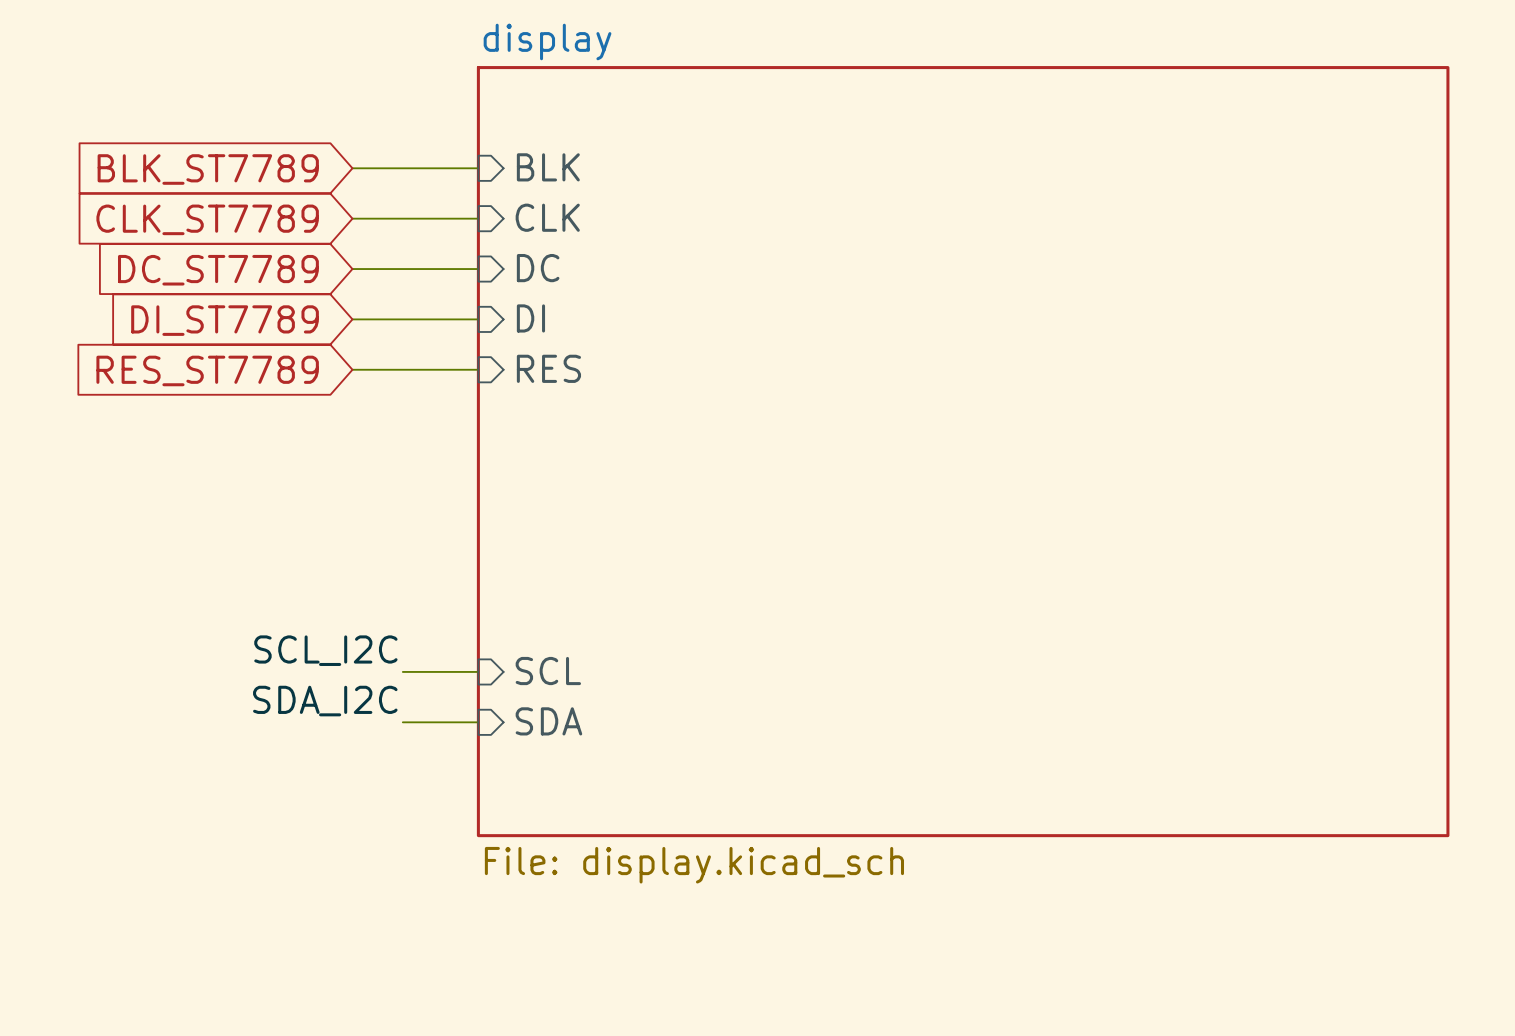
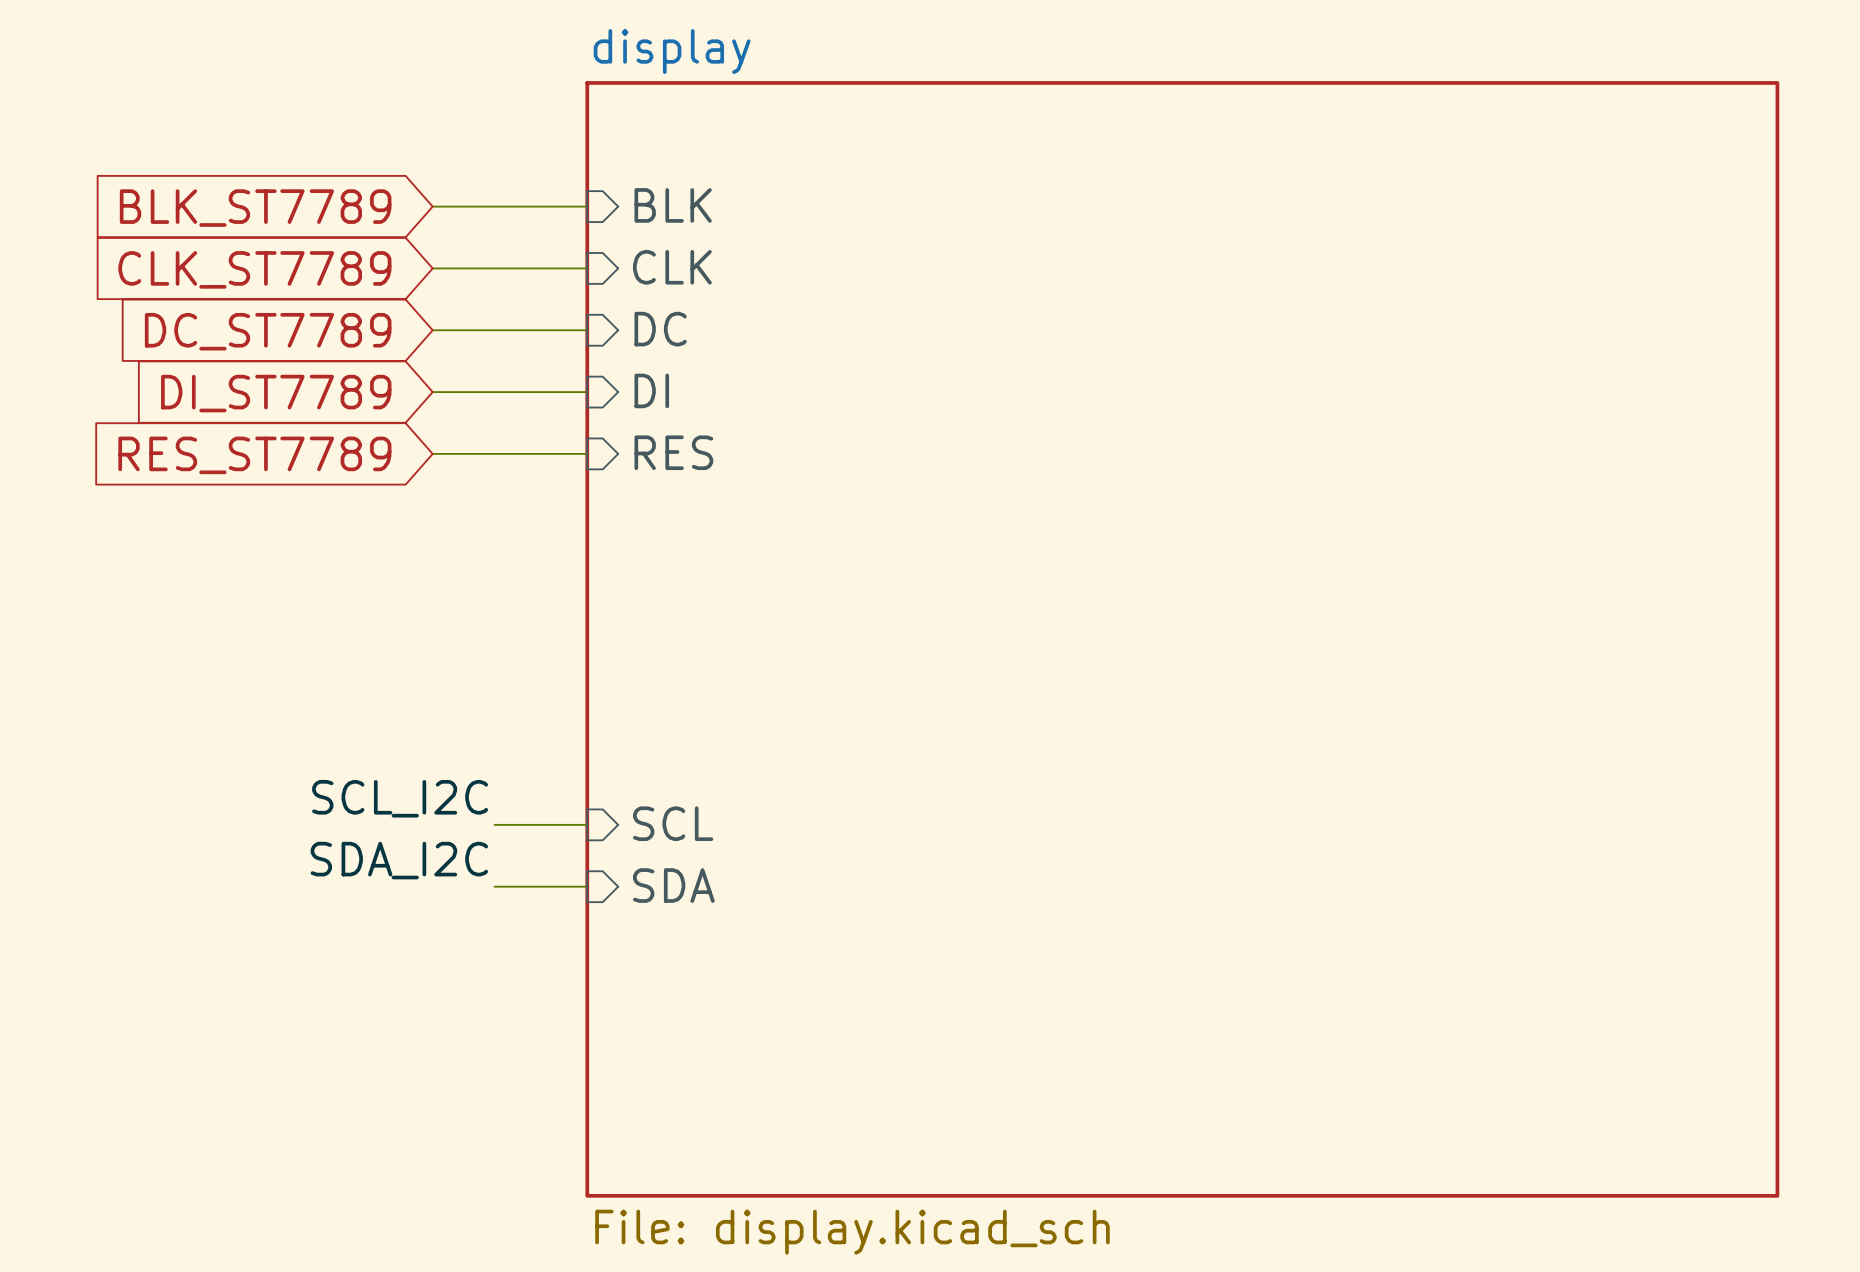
sheet display: File: display.kicad_sch (963, 451) -> none
sheet display: none -> File: display.kicad_sch (1182, 639)

